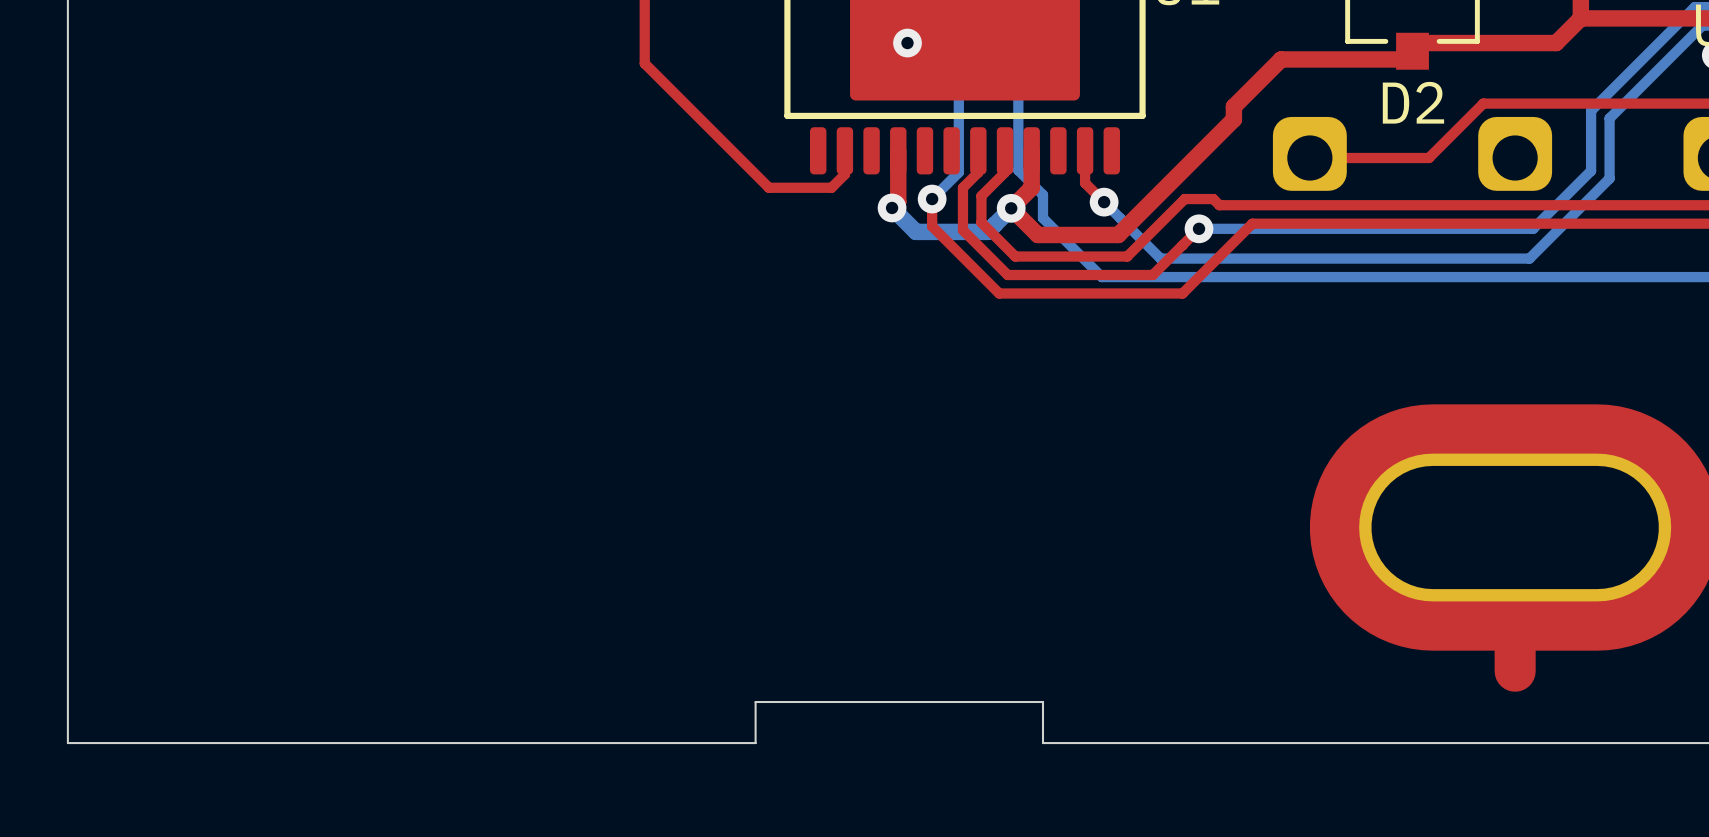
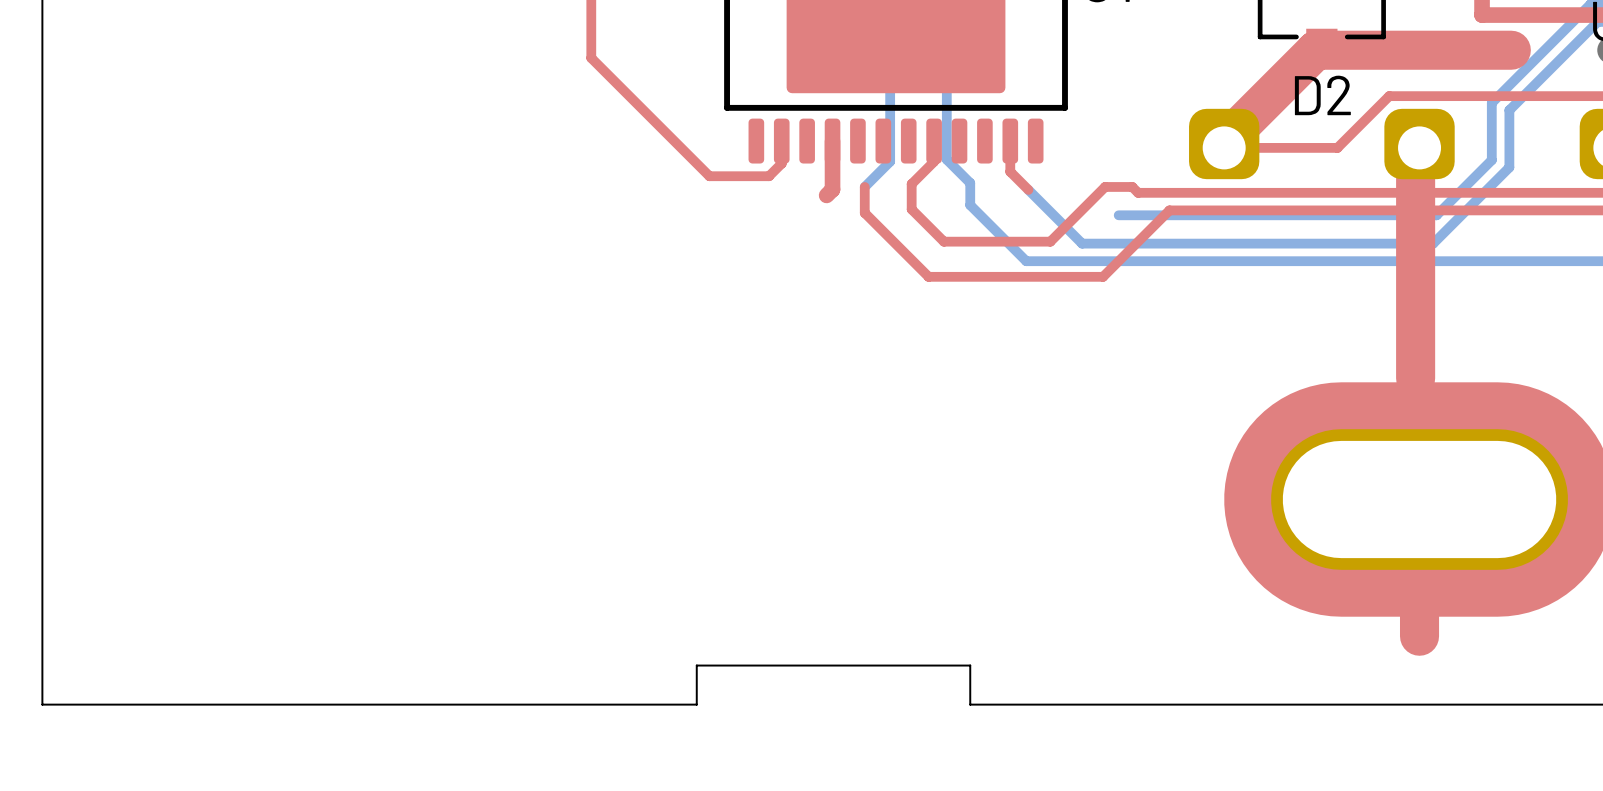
top track: (1580, 18) (1556, 43) (1420, 43) (1404, 59) (1281, 59) (1233, 106) (1233, 119) (1118, 234) (1037, 234) (1011, 208) (1031, 187) (1031, 150) -> none
via: (907, 43) -> none
top track: none -> (1511, 50) (1315, 50) (1218, 147)
top track: (978, 150) (978, 172) (962, 187) (962, 230) (1007, 275) (1152, 275) (1199, 228) -> none
top track: none -> (1415, 151) (1415, 378)
via: (932, 199) -> none
via: (1104, 202) -> none
bottom track: (892, 207) (916, 231) (987, 231) (1011, 208) -> none
via: (892, 207) -> none
via: (1011, 208) -> none
via: (1199, 228) -> none

